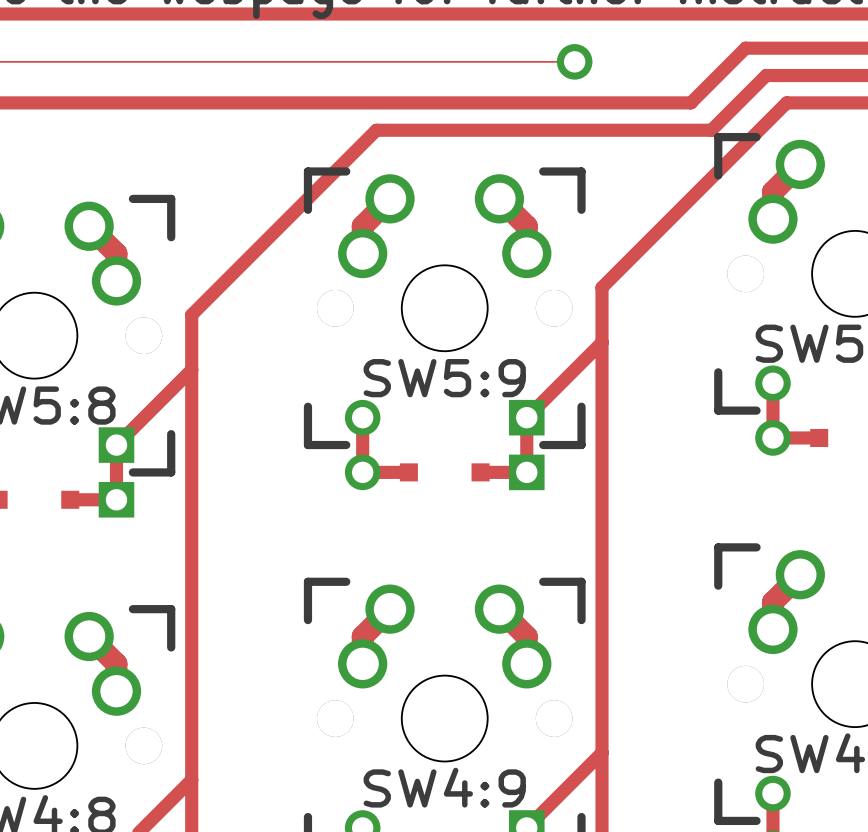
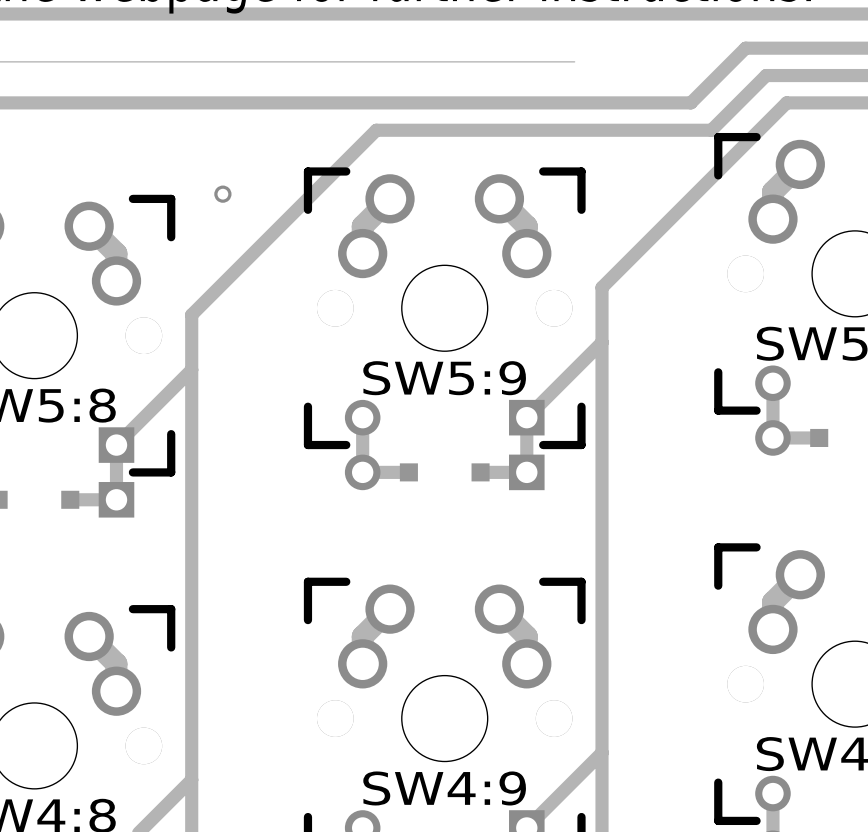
via: (574, 61) -> none
part: none -> (222, 194)

